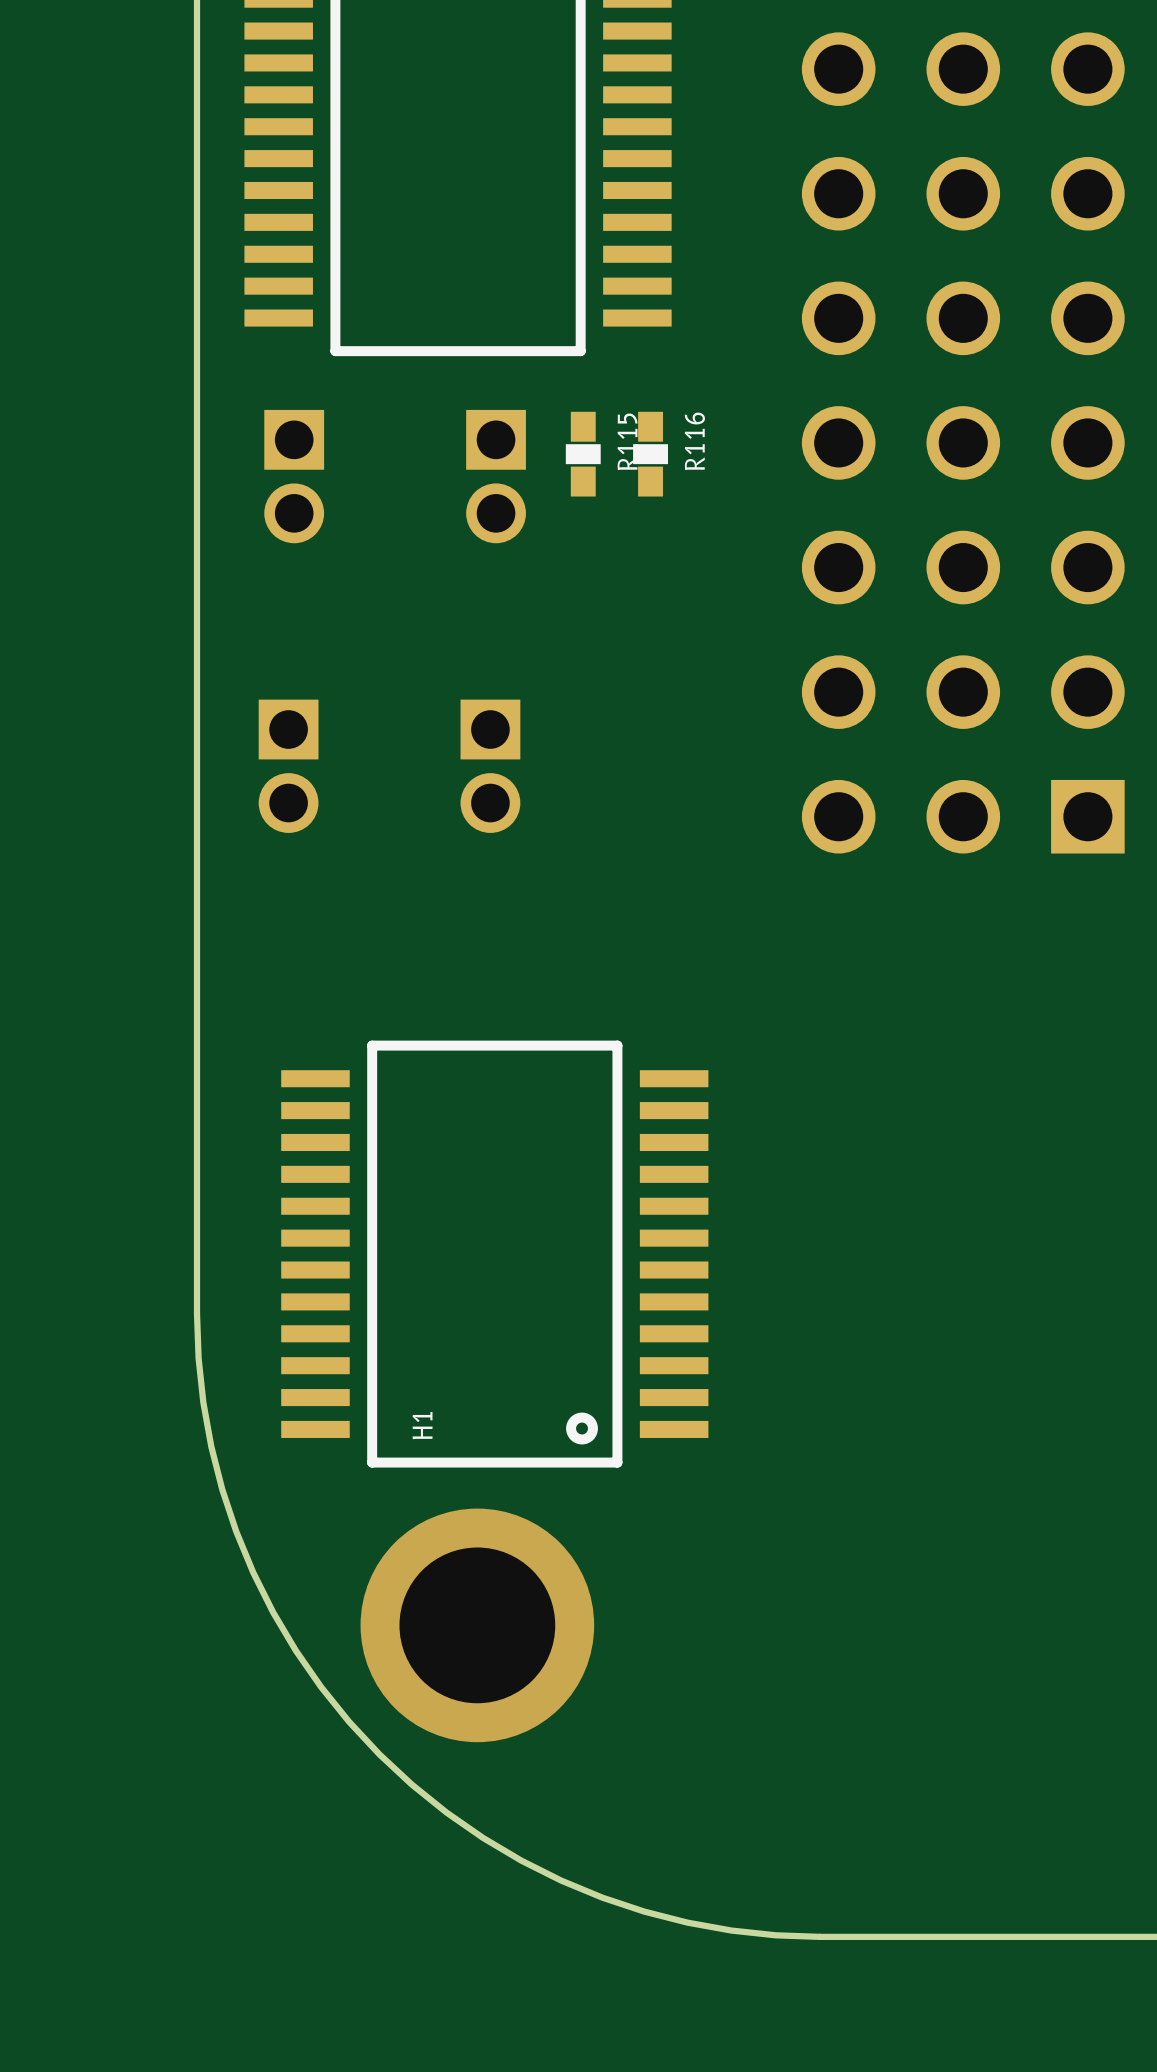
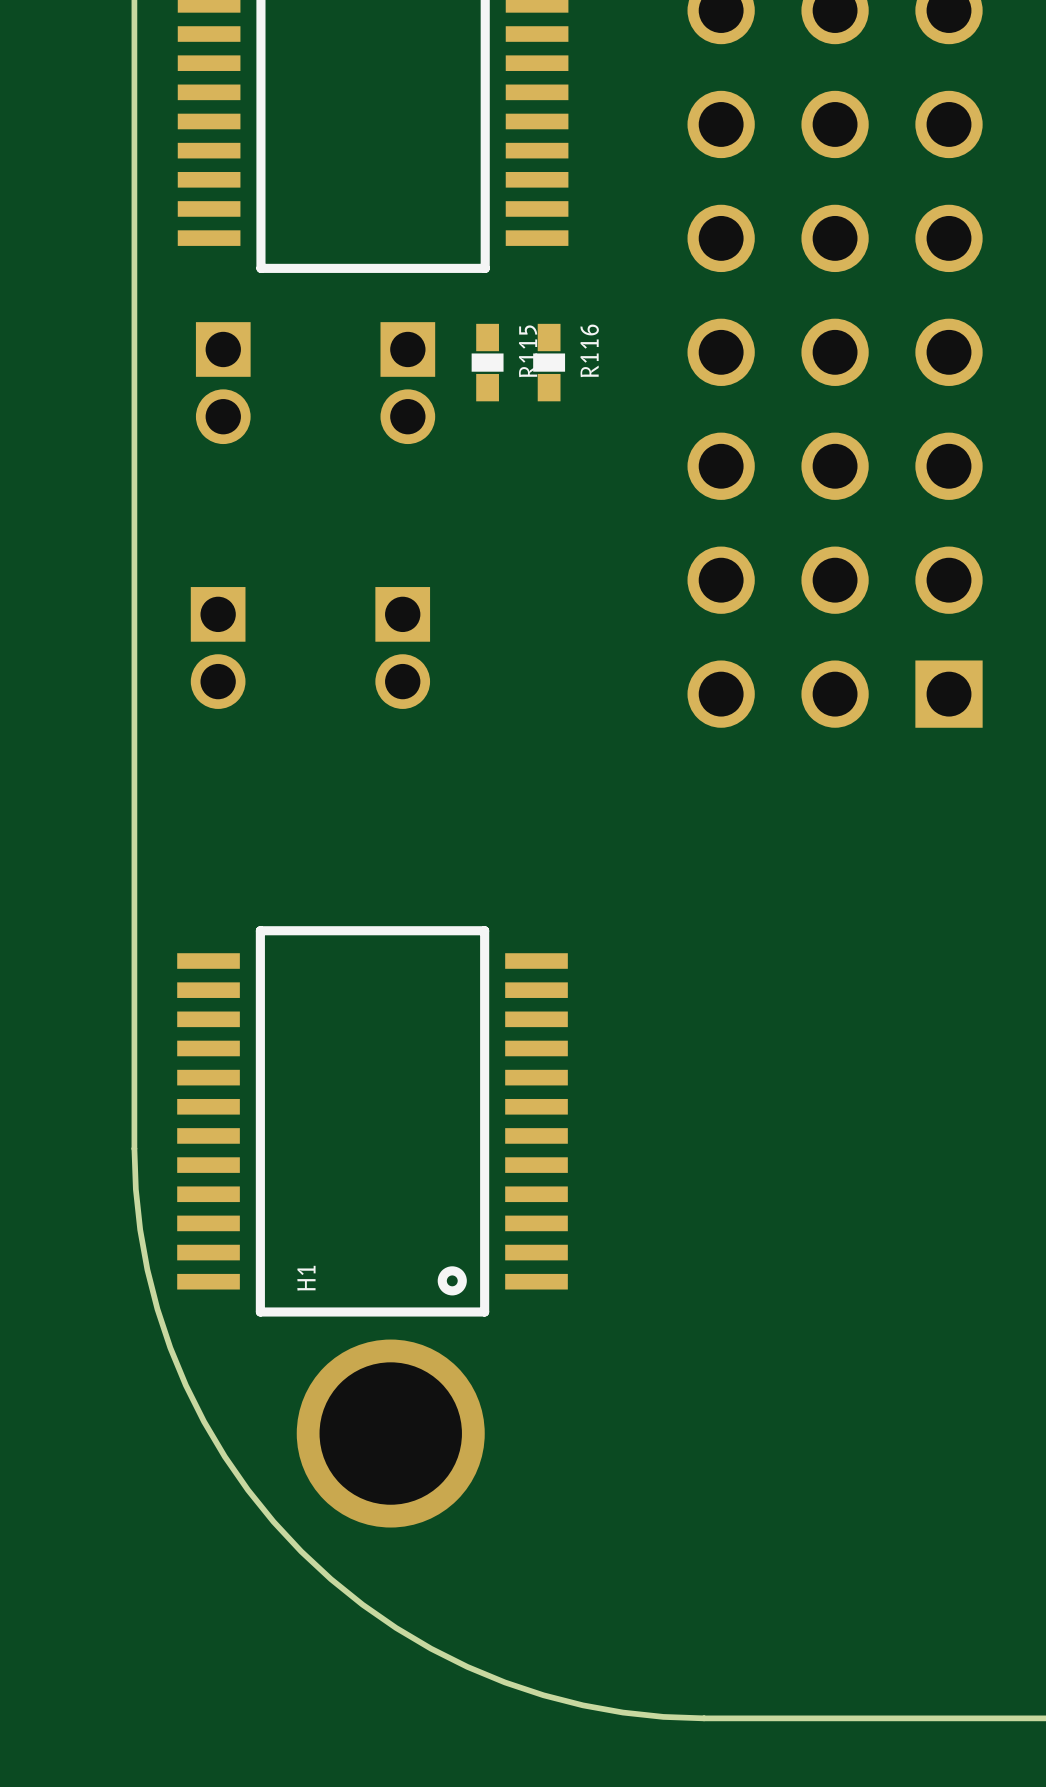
H1 position: (494, 1254) -> (372, 1121)
via size: [360, 1508, 595, 1743] -> [296, 1339, 485, 1528]

